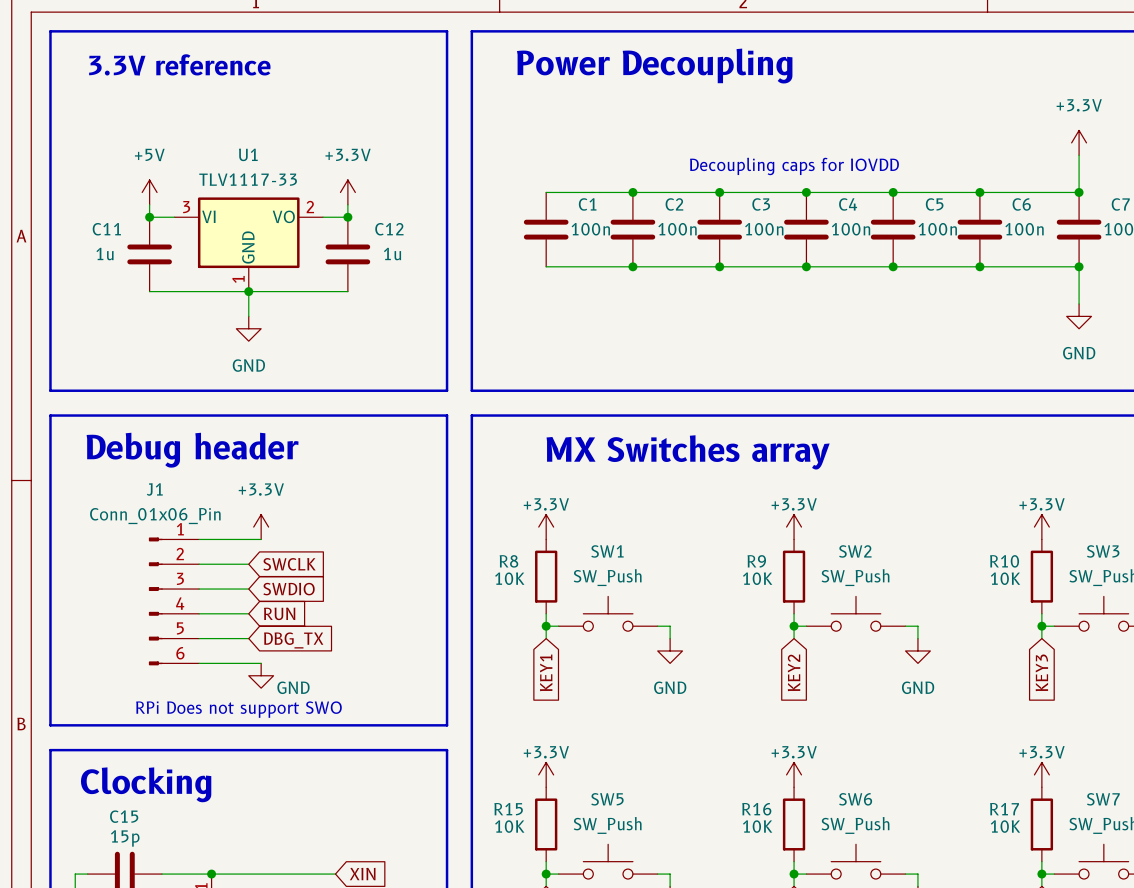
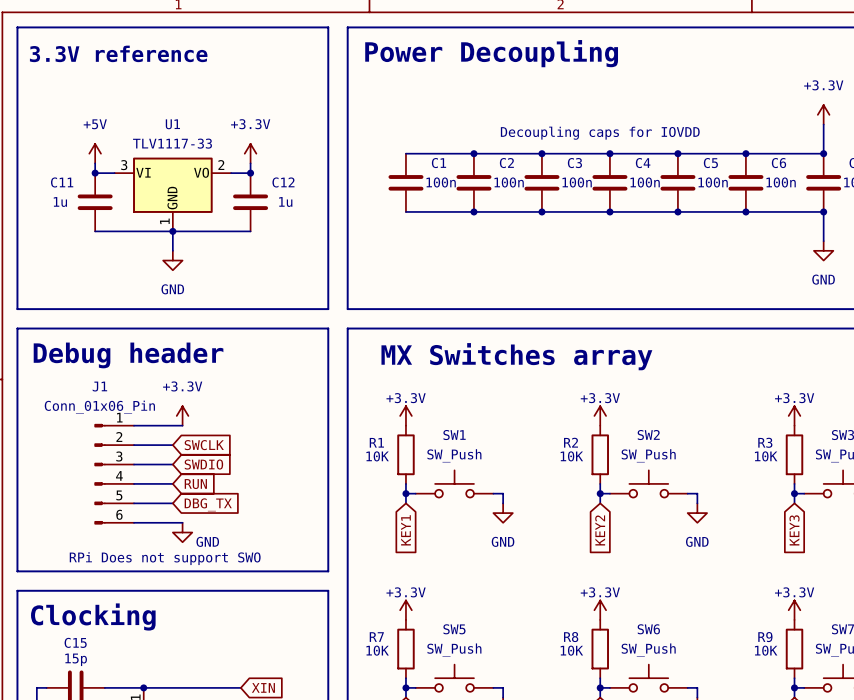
R8 name: R8 (508, 561) -> R1 (376, 442)
R9 name: R9 (756, 561) -> R2 (571, 442)
R10 name: R10 (1004, 561) -> R3 (765, 442)
R15 name: R15 (508, 809) -> R7 (376, 637)
R16 name: R16 (756, 809) -> R8 (571, 637)
R17 name: R17 (1004, 809) -> R9 (765, 637)

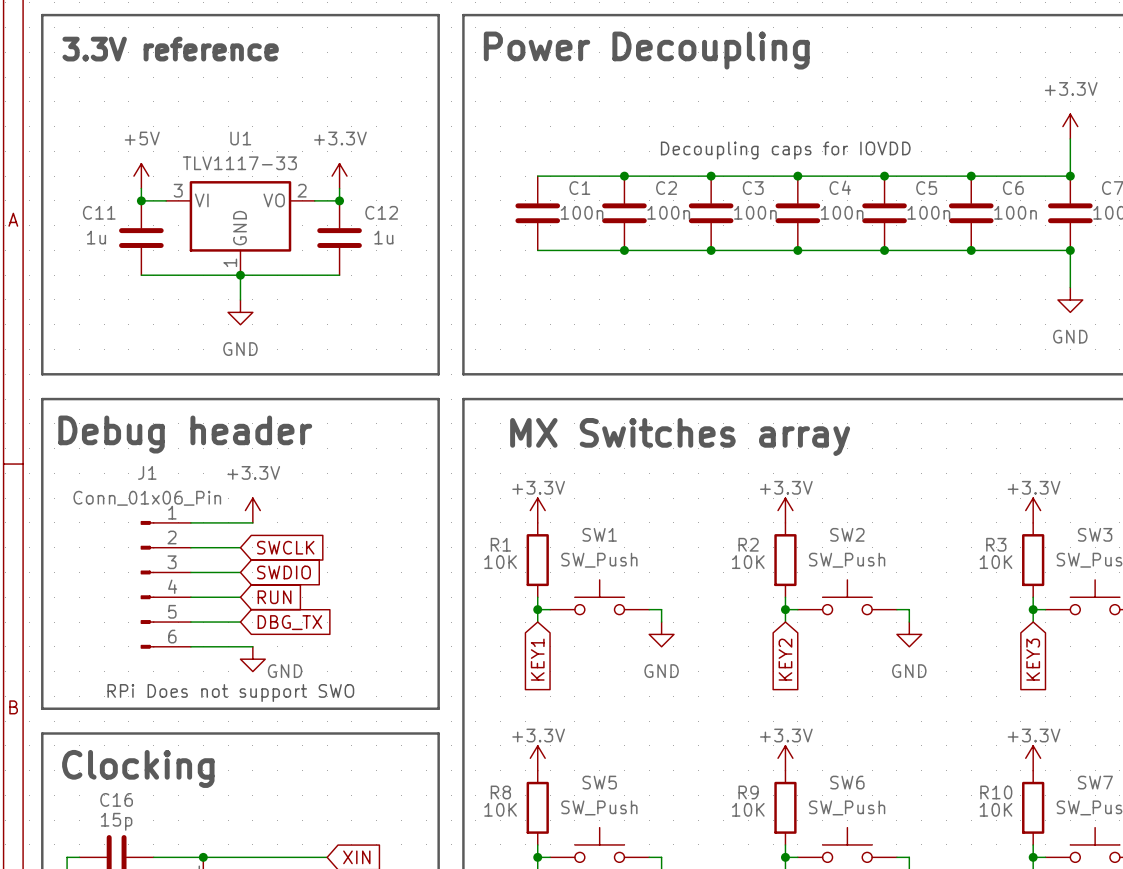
R7 name: R7 (376, 637) -> R8 (500, 792)
R8 name: R8 (571, 637) -> R9 (748, 792)
R9 name: R9 (765, 637) -> R10 (996, 792)
C15 name: C15 (75, 642) -> C16 (116, 799)

